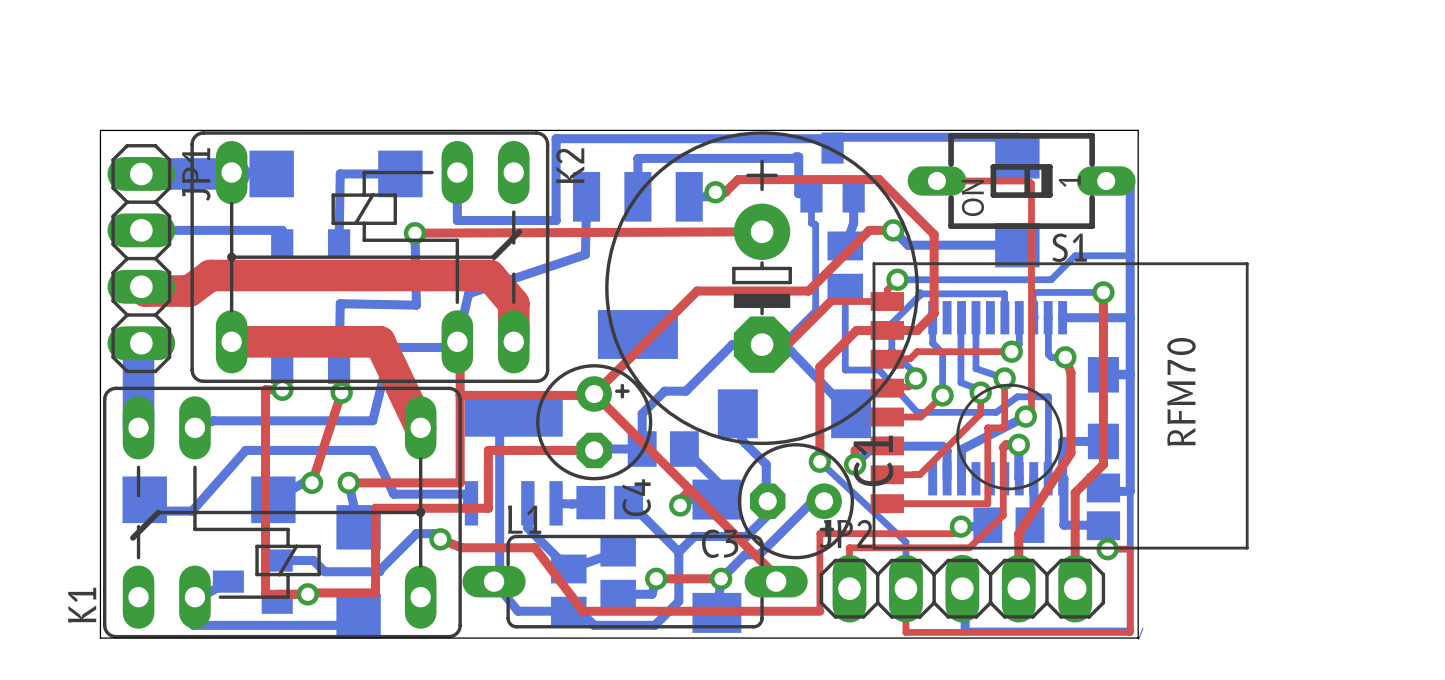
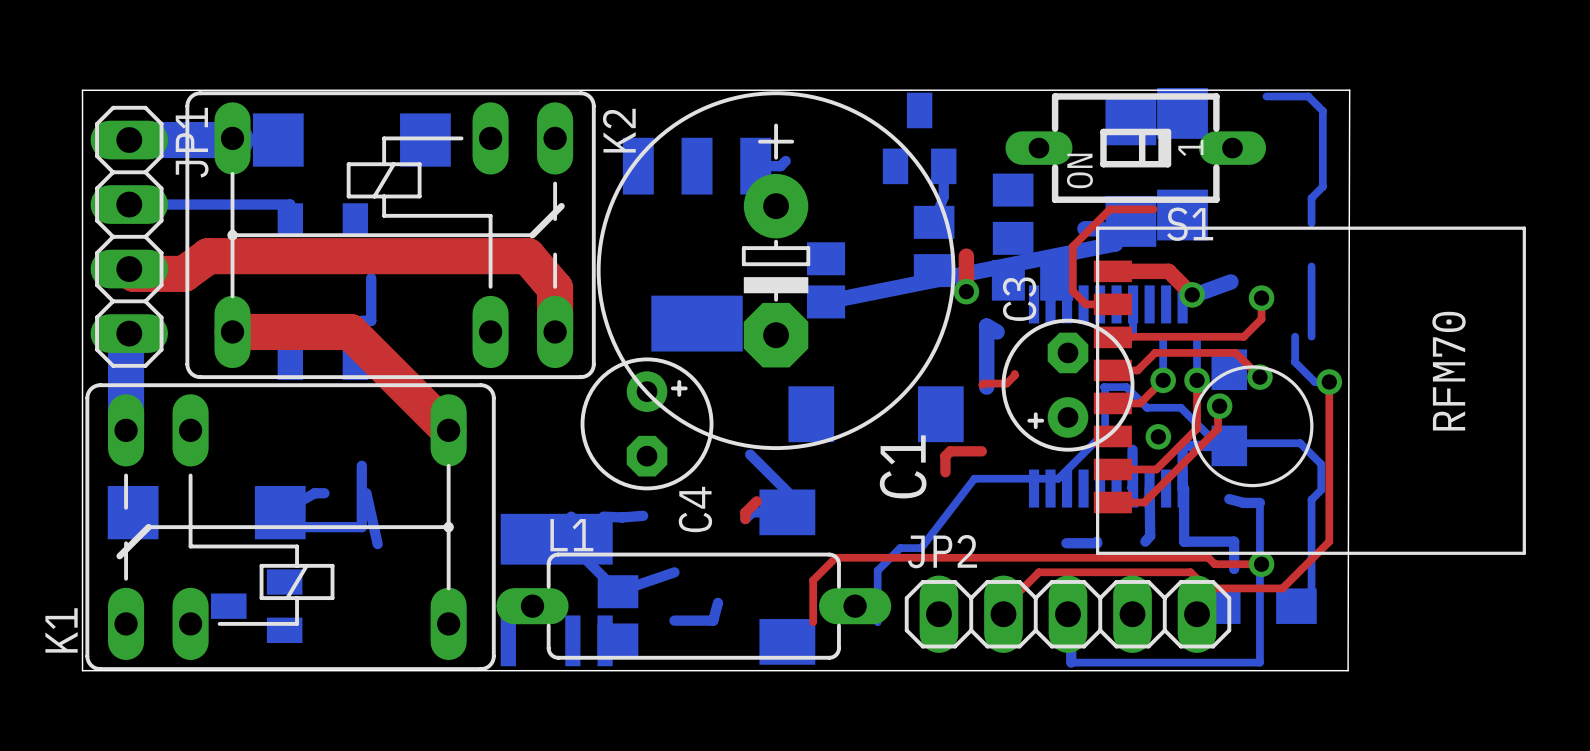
board edge: (1138, 130) (1138, 638) -> (1269, 90) (1349, 90) (1348, 670) (1269, 670)
bottom track: none -> (1266, 96) (1308, 96) (1322, 111) (1322, 186) (1311, 198) (1311, 223)
bottom track: (1017, 156) (1017, 137) (833, 137) (832, 148) (831, 138) (556, 138) (556, 220) (457, 220) (457, 172) -> none
bottom track: (400, 173) (340, 173) (339, 243) -> none
top track: (936, 181) (1025, 181) (1031, 183) (1031, 417) (1025, 416) -> none
bottom track: (1106, 181) (1130, 181) (1130, 374) (1103, 374) (1130, 374) (1130, 491) -> none
top track: (715, 192) (725, 192) (738, 179) (879, 179) (934, 234) (934, 313) (917, 330) (887, 330) -> none
via: (715, 192) -> none
part: none -> (1182, 164)
bottom track: (586, 196) (585, 254) (468, 293) (457, 341) (451, 347) (391, 347) (372, 420) (213, 420) (194, 427) -> none
bottom track: (637, 196) (637, 158) (798, 157) (798, 193) (811, 193) (811, 223) (815, 224) (815, 310) (781, 344) -> none
bottom track: (893, 230) (908, 245) (1017, 245) -> none
top track: (893, 230) (869, 230) (808, 291) (697, 291) (594, 394) -> none
via: (893, 230) -> none
top track: (762, 231) (415, 233) -> none
bottom track: (415, 233) (416, 305) (340, 303) (339, 369) (341, 392) -> none
via: (415, 233) -> none
top track: none -> (1153, 209) (1109, 209) (1072, 246) (1072, 291) (1085, 304) (1112, 304)
part: none -> (1013, 214)
bottom track: none -> (1084, 228) (1100, 228) (1115, 243) (826, 301)
bottom track: (1130, 255) (1075, 255) (1051, 279) (897, 279) -> none
top track: none -> (966, 256) (966, 291)
top track: (897, 279) (887, 289) (887, 301) (830, 301) (786, 346) (762, 344) -> none
via position: (897, 279) -> (966, 291)
bottom track: none -> (1311, 266) (1311, 336)
C1 position: (762, 288) -> (776, 270)
bottom track: (845, 288) (845, 370) (879, 370) (917, 412) (996, 412) (1017, 396) (1048, 396) (1048, 478) -> none
top track: none -> (1112, 271) (1168, 271) (1192, 294)
bottom track: (920, 292) (920, 295) (891, 323) (891, 350) (915, 374) (915, 378) -> none
bottom track: (1103, 292) (1032, 292) (1033, 317) -> none
top track: (1103, 292) (1103, 464) (1075, 492) (1075, 588) -> none
via: (1103, 292) -> none
bottom track: (920, 293) (1004, 293) (1004, 317) -> none
bottom track: none -> (371, 278) (371, 320) (361, 320)
part: none -> (826, 280)
part: none -> (1032, 280)
bottom track: none -> (1230, 281) (1192, 294)
via: none -> (1192, 294)
top track: none -> (1261, 298) (1261, 319) (1243, 336) (1112, 337)
via: none -> (1261, 298)
bottom track: (932, 317) (932, 343) (942, 353) (942, 395) -> none
bottom track: (961, 317) (960, 382) (976, 388) (980, 392) -> none
bottom track: (975, 317) (975, 368) (1004, 378) -> none
bottom track: (1048, 317) (1048, 354) (1051, 357) (1065, 357) -> none
bottom track: (1062, 317) (1130, 317) -> none
top track: (887, 330) (856, 330) (819, 367) (819, 461) -> none
top track: (334, 341) (379, 341) (420, 427) -> (350, 331) (448, 430)
top track: (457, 341) (460, 344) (460, 482) (348, 482) -> none
bottom track: none -> (997, 331) (986, 326) (986, 387)
bottom track: none -> (1196, 336) (1197, 380)
bottom track: none -> (1295, 336) (1295, 362) (1314, 381) (1329, 381)
bottom track: none -> (1163, 336) (1163, 380)
top track: (1011, 351) (917, 351) (910, 358) (887, 359) -> none
via: (1011, 351) -> none
top track: (1065, 357) (1070, 372) (1070, 453) (1018, 533) (1018, 588) -> none
via: (1065, 357) -> none
top track: none -> (1112, 370) (1137, 370) (1155, 352) (1235, 352) (1259, 377)
via: (915, 378) -> none
top track: (1004, 378) (1004, 426) (987, 427) (987, 503) (887, 503) -> none
via: (1004, 378) -> none
via: none -> (1259, 377)
top track: none -> (1163, 380) (1140, 403) (1112, 403)
via: none -> (1163, 380)
top track: none -> (1197, 380) (1197, 428) (1156, 469) (1112, 469)
via: none -> (1197, 380)
top track: none -> (1329, 381) (1329, 541) (1282, 588) (1206, 588) (1190, 572) (1038, 572) (1006, 604) (1006, 622)
via: none -> (1329, 381)
top track: (282, 389) (265, 389) (265, 594) (375, 592) (375, 508) (488, 508) (488, 450) (594, 450) -> none
via: (282, 389) -> none
top track: (341, 392) (312, 482) -> none
via: (341, 392) -> none
top track: (980, 392) (980, 413) (920, 474) (887, 474) -> none
via: (980, 392) -> none
top track: (594, 394) (781, 581) (776, 581) -> none
top track: (594, 394) (460, 395) -> none
top track: (942, 395) (921, 417) (887, 417) -> none
via: (942, 395) -> none
part position: (1059, 405) -> (1309, 390)
top track: none -> (1219, 406) (1218, 428) (1144, 502) (1112, 502)
via: none -> (1219, 406)
bottom track: (737, 413) (742, 440) (766, 464) (767, 515) (746, 536) (694, 536) (678, 552) -> none
bottom track: (851, 413) (784, 344) (732, 344) (685, 391) (664, 391) (642, 413) (642, 449) (594, 450) -> none
bottom track: (513, 414) (499, 428) (499, 581) (494, 581) (517, 611) (580, 611) (594, 625) (654, 625) (678, 601) (678, 552) -> none
bottom track: (1025, 416) (961, 449) (961, 478) -> none
via: (1025, 416) -> none
via: none -> (1158, 436)
top track: (1018, 444) (1006, 444) (1003, 447) (1003, 515) (969, 547) (849, 547) (849, 588) -> none
via: (1018, 444) -> none
part: (663, 449) -> none
bottom track: none -> (361, 465) (361, 527) (272, 527)
part position: (513, 458) -> (556, 590)
bottom track: (819, 461) (905, 542) (905, 588) -> none
via: (819, 461) -> none
bottom track: (855, 464) (873, 446) (942, 446) (947, 450) (947, 478) -> none
via: (855, 464) -> none
via: (312, 482) -> none
via: (348, 482) -> none
bottom track: (144, 499) (139, 511) (192, 511) (245, 450) (372, 450) (393, 494) (467, 494) (467, 503) (471, 503) -> none
C3 rotation: 0° (795, 501) -> 90° clockwise (1068, 385)
C3 position: (795, 501) -> (1068, 385)
bottom track: (824, 501) (812, 501) (759, 554) (745, 554) (721, 578) (716, 612) -> none
part: (609, 502) -> none
bottom track: (628, 502) (678, 552) -> none
via: (680, 505) -> none
part: (1103, 506) -> none
part: (1008, 525) -> none
top track: (960, 526) (955, 533) (819, 533) (819, 611) (582, 611) (534, 547) (461, 547) (440, 539) -> none
via: (960, 526) -> none
bottom track: (440, 539) (434, 533) (416, 533) (379, 571) (324, 571) (313, 560) (277, 560) -> none
via: (440, 539) -> none
top track: none -> (1261, 564) (1214, 564) (1208, 557) (835, 557) (813, 580) (813, 622)
top track: (1107, 549) (1130, 549) (1130, 632) (905, 632) (905, 588) -> none
via position: (1107, 549) -> (1261, 564)
part: (358, 571) -> none
part: (618, 573) -> none
top track: (656, 578) (721, 578) -> none
via: (656, 578) -> none
via: (721, 578) -> none
bottom track: (228, 581) (193, 601) (193, 625) (337, 625) (358, 616) -> none
part: none -> (1258, 606)
bottom track: none -> (1296, 606) (1311, 590) (1311, 499) (1321, 490) (1321, 464) (1300, 443) (1216, 443) (1180, 407) (1147, 407) (1126, 387) (1104, 387) (1105, 431) (1058, 478) (974, 478) (921, 548) (900, 548) (877, 570) (877, 622)
via: (307, 594) -> none
bottom track: (1142, 628) (1138, 639) -> none

